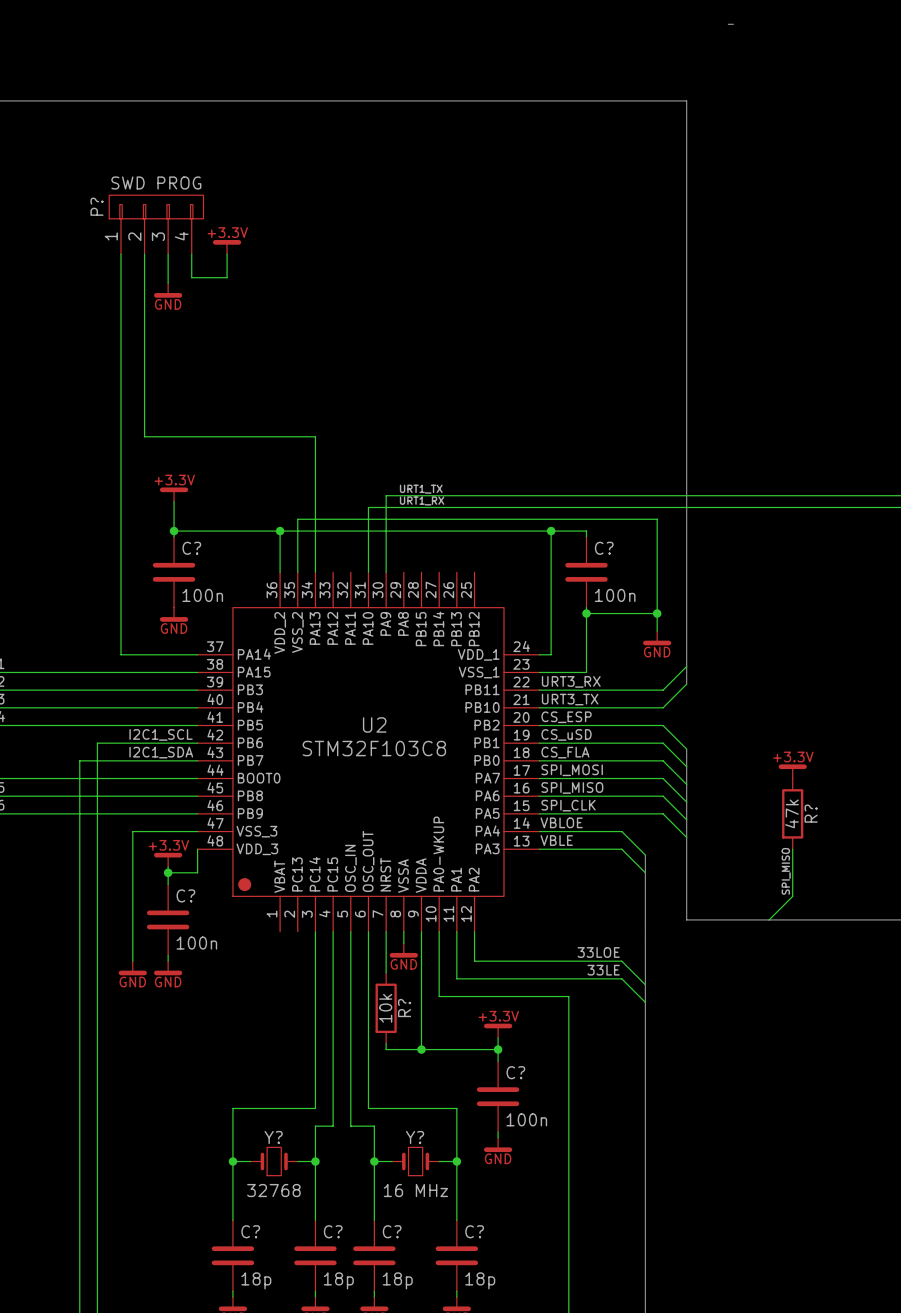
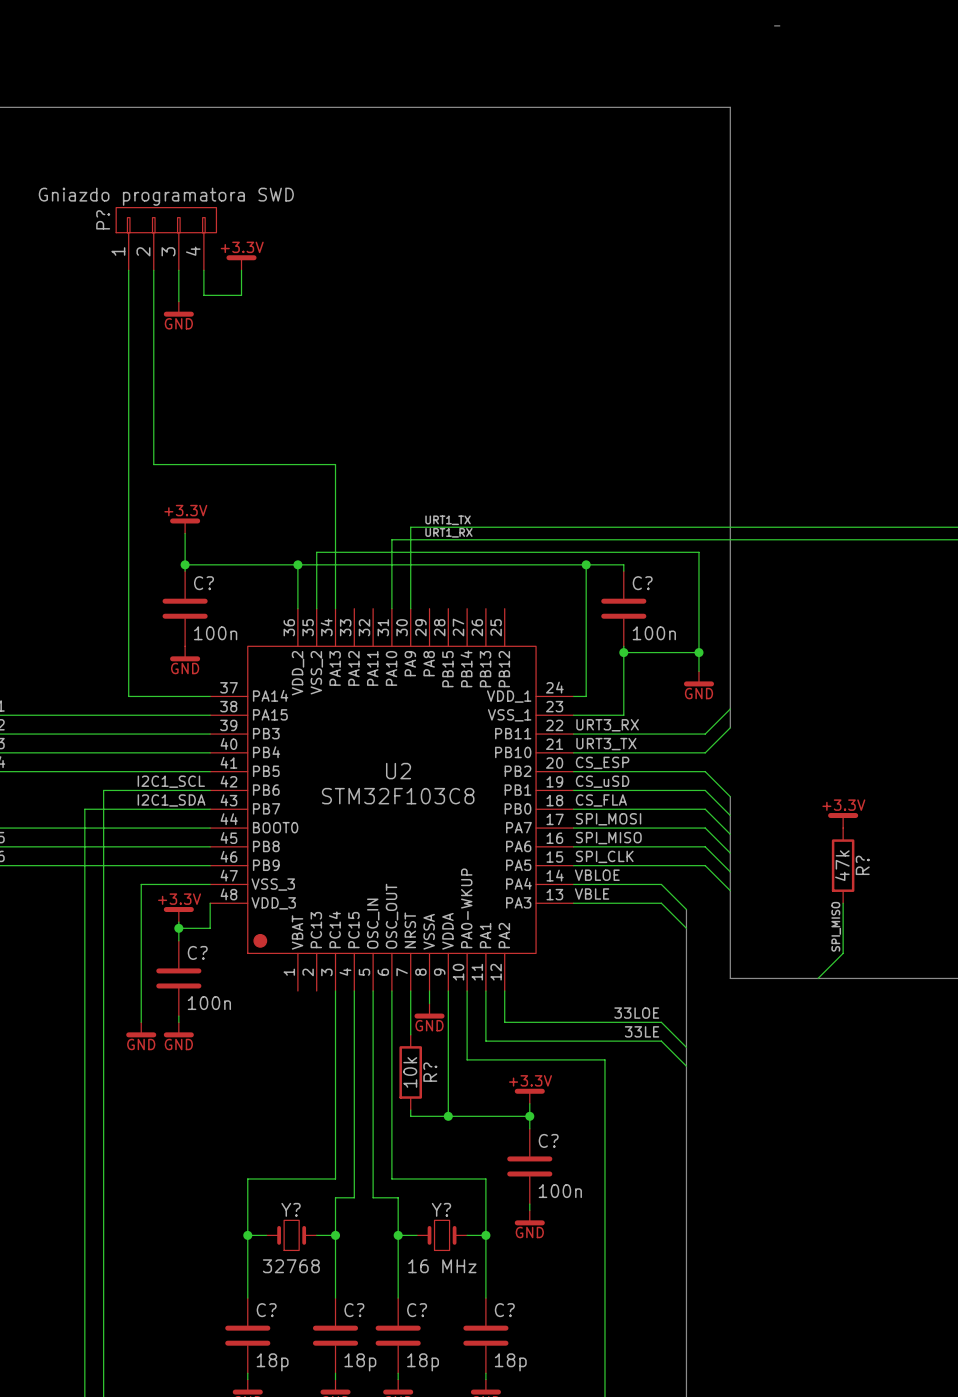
P? value: SWD PROG (156, 182) -> Gniazdo programatora SWD (166, 196)

